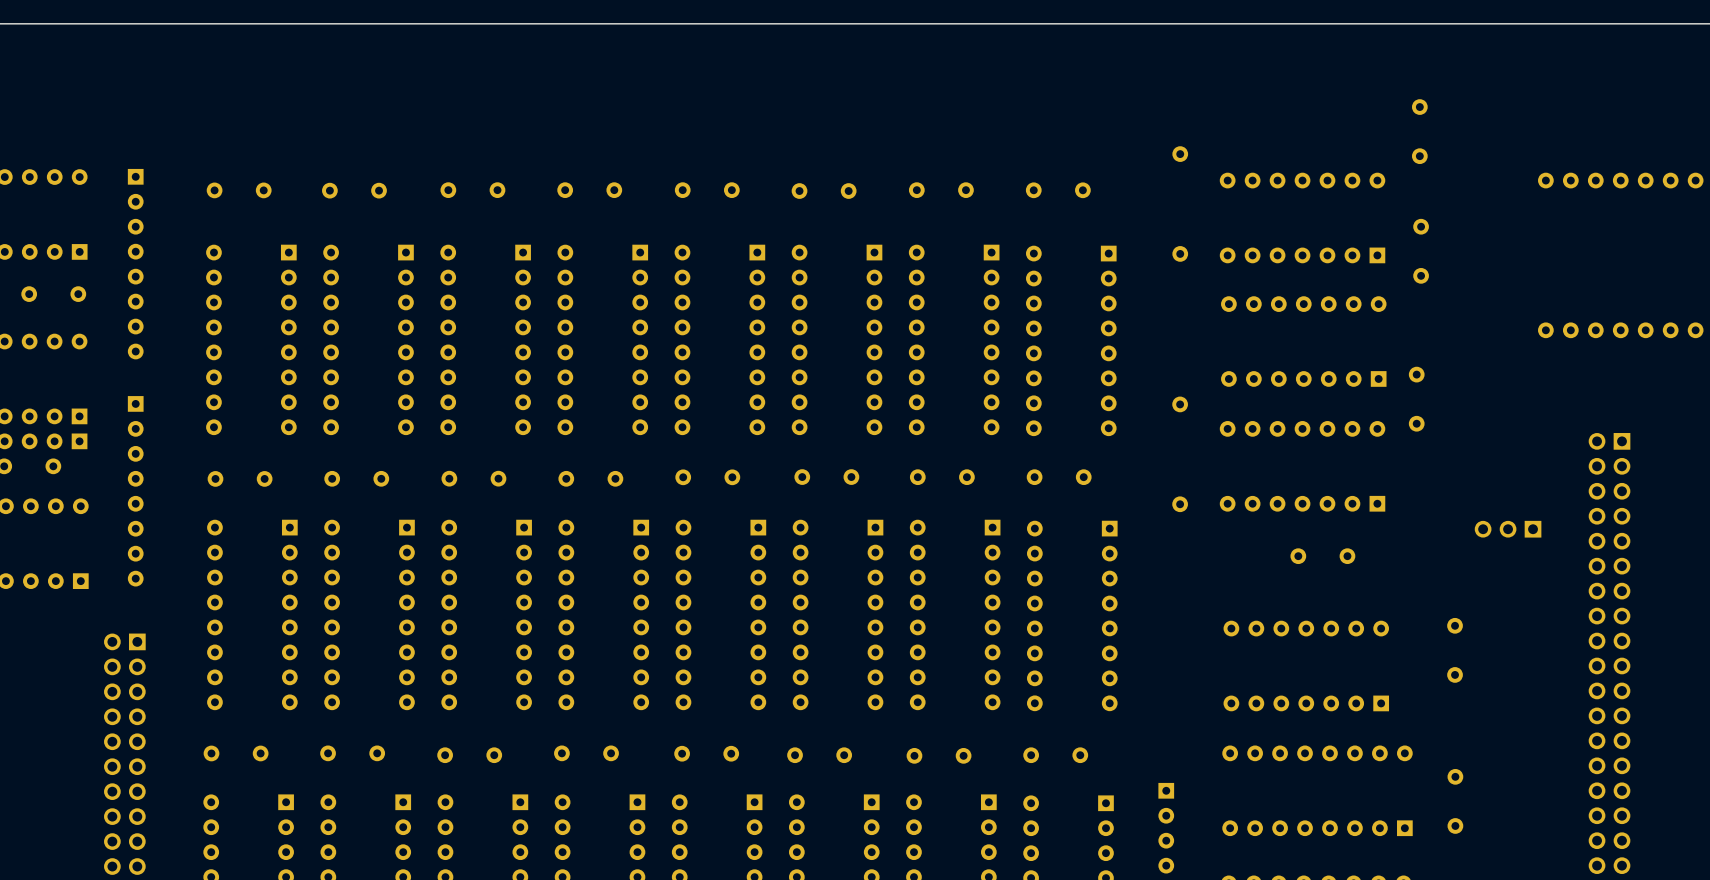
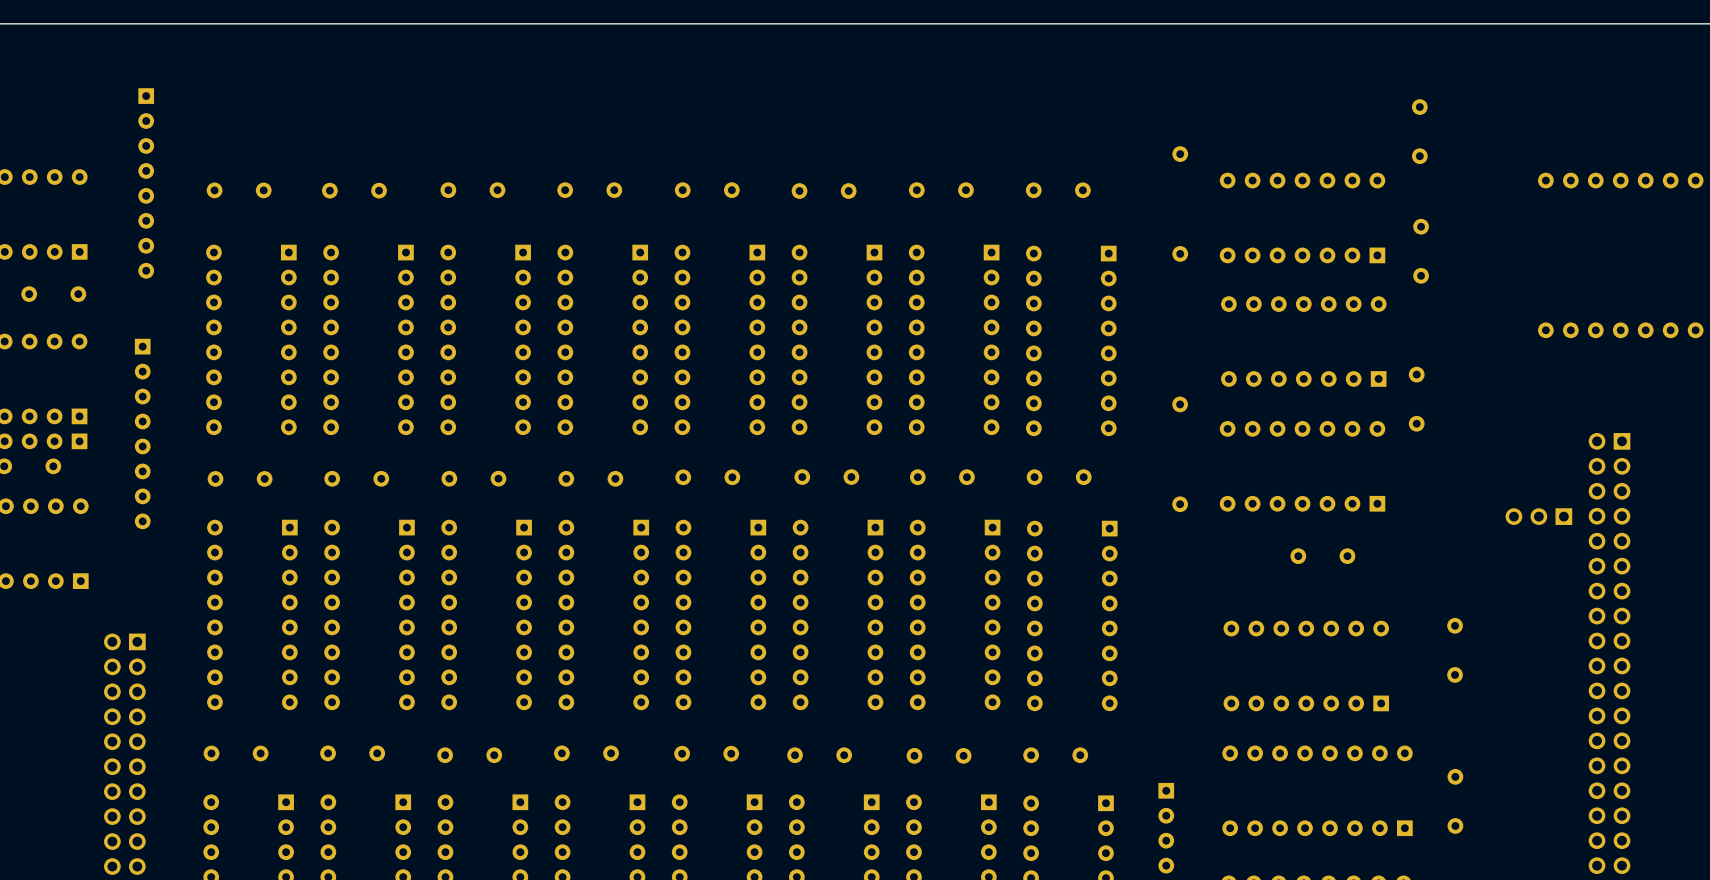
part position: (135, 264) -> (146, 183)
part position: (135, 491) -> (142, 434)
part position: (1508, 529) -> (1538, 516)

